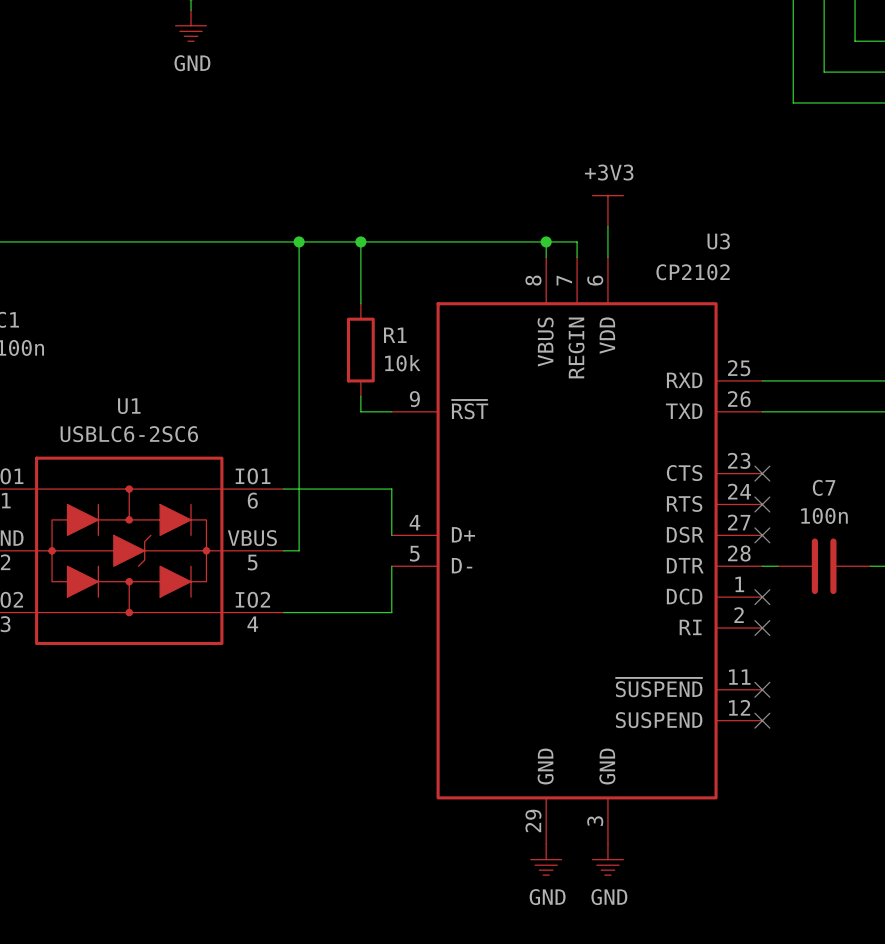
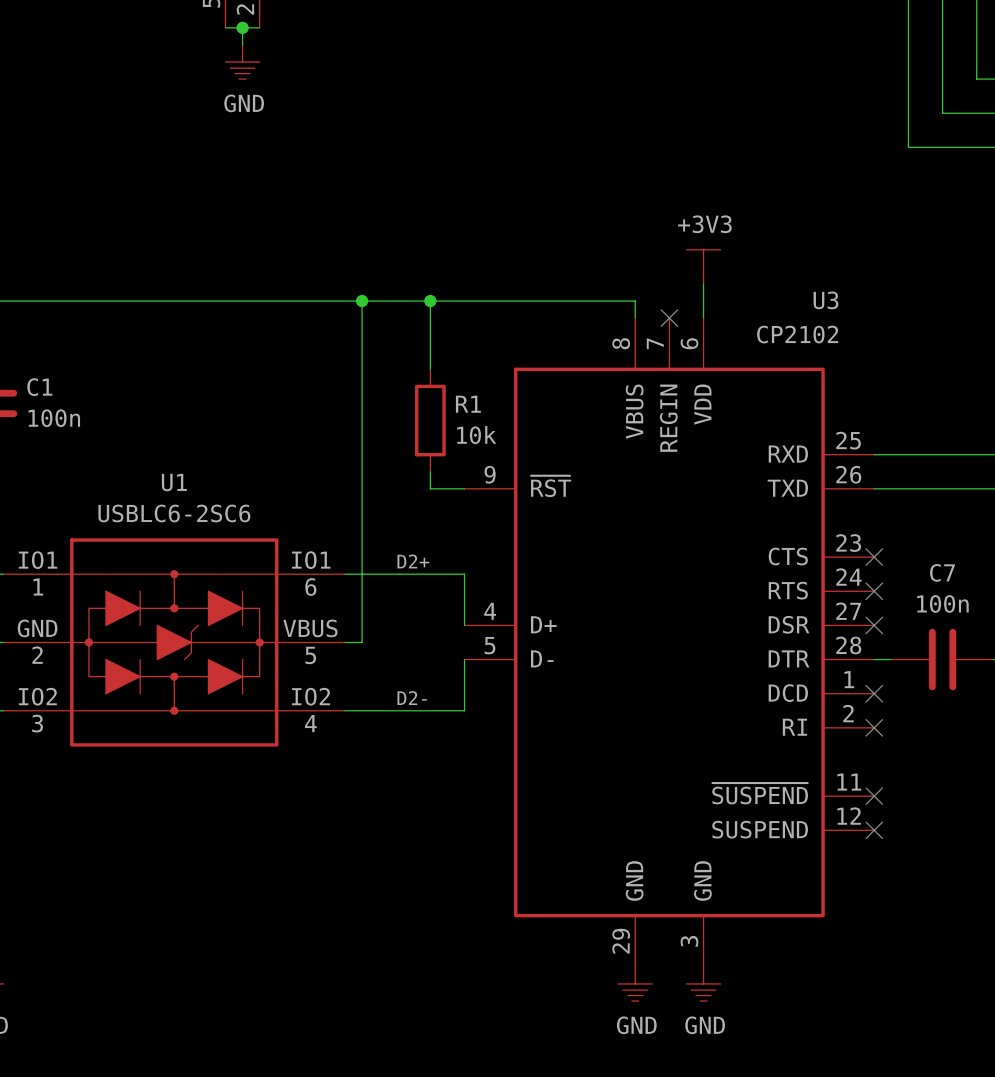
wire: (546, 241) (577, 241) (577, 257) -> none
junction: (546, 241) -> none
no-connect mark: none -> (669, 318)
label: none -> D2+ (413, 561)
label: none -> D2- (412, 698)

